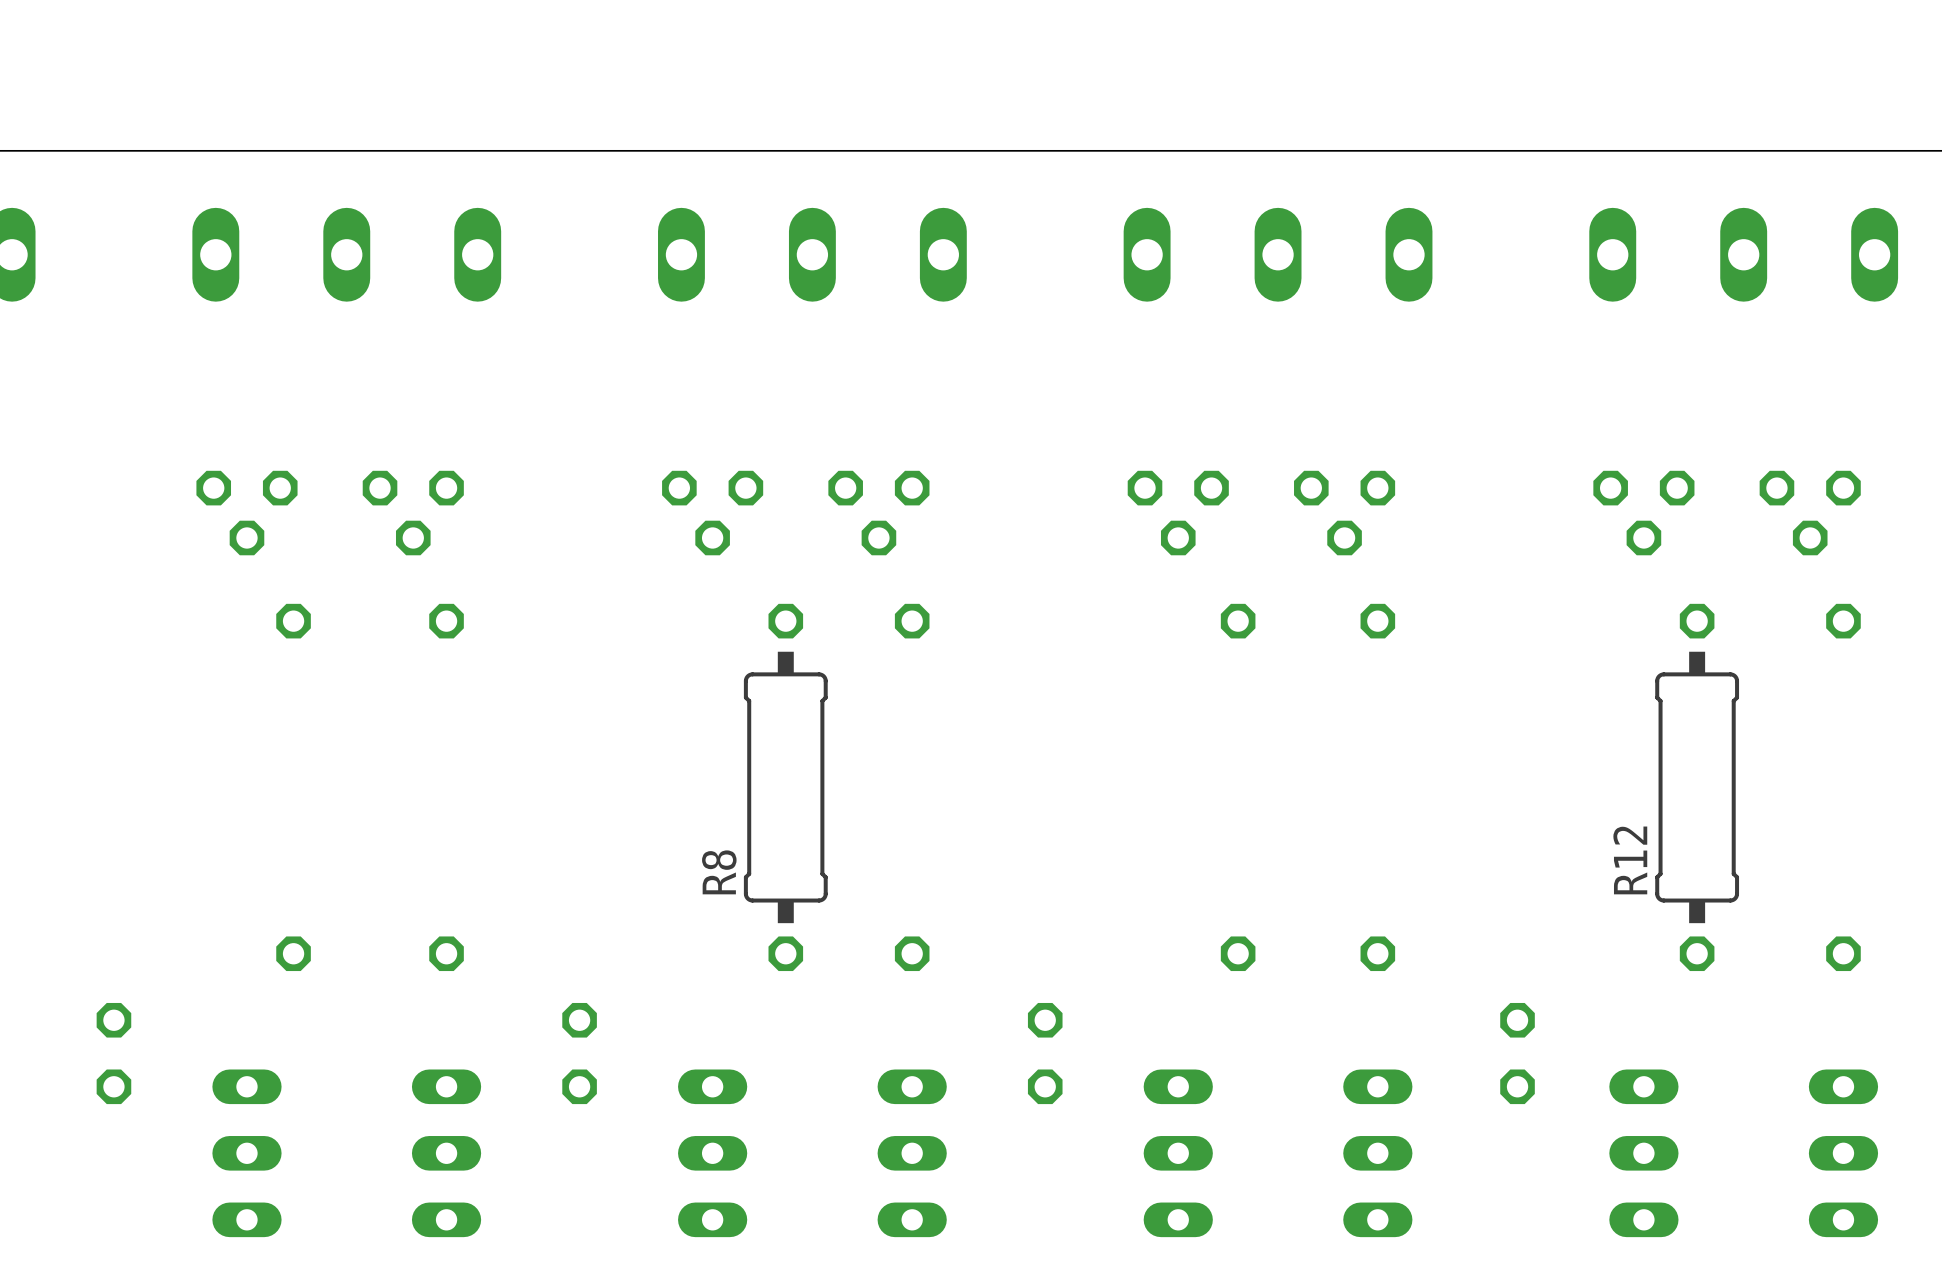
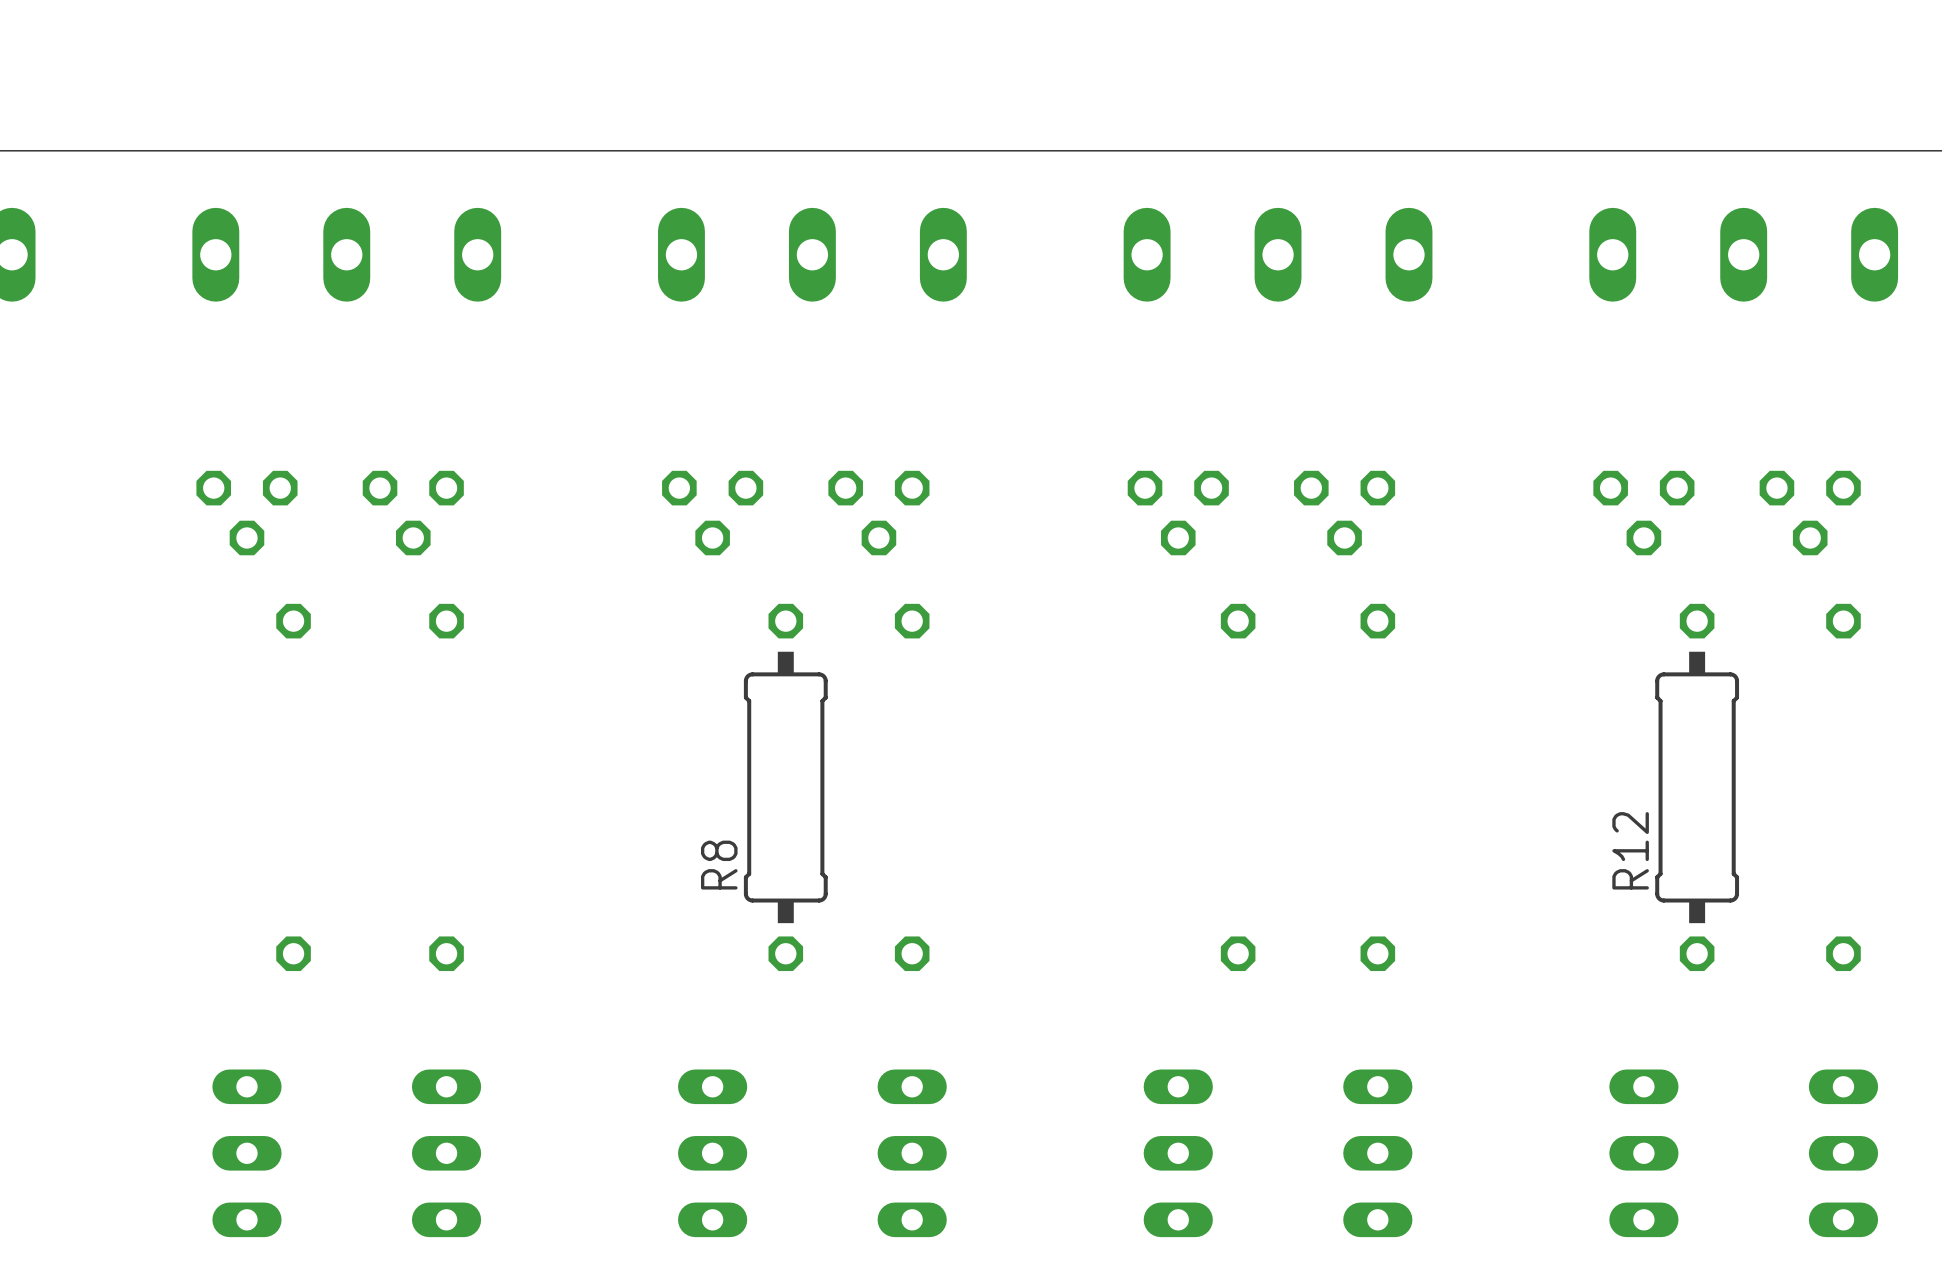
part: (113, 1053) -> none
part: (579, 1053) -> none
part: (1045, 1053) -> none
part: (1517, 1053) -> none

